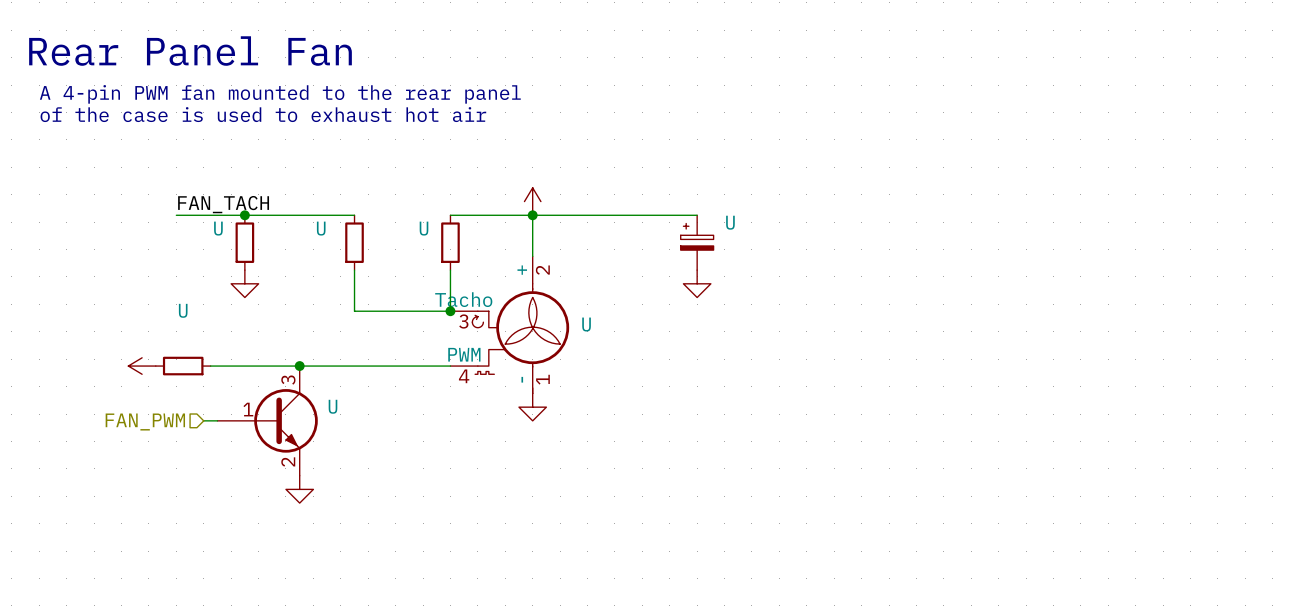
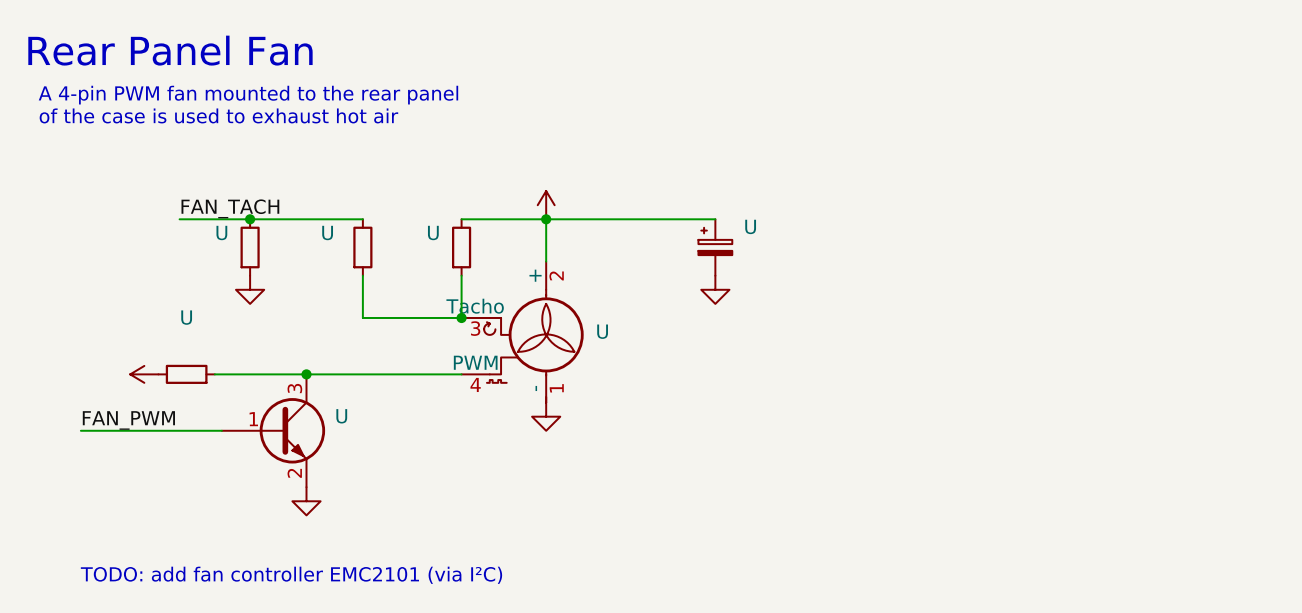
label: none -> FAN_PWM (128, 420)
wire: none -> (80, 430) (207, 430)
hierarchical label: FAN_PWM (145, 422) -> none
text: none -> TODO: add fan controller EMC2101 (via I²C) (291, 575)

